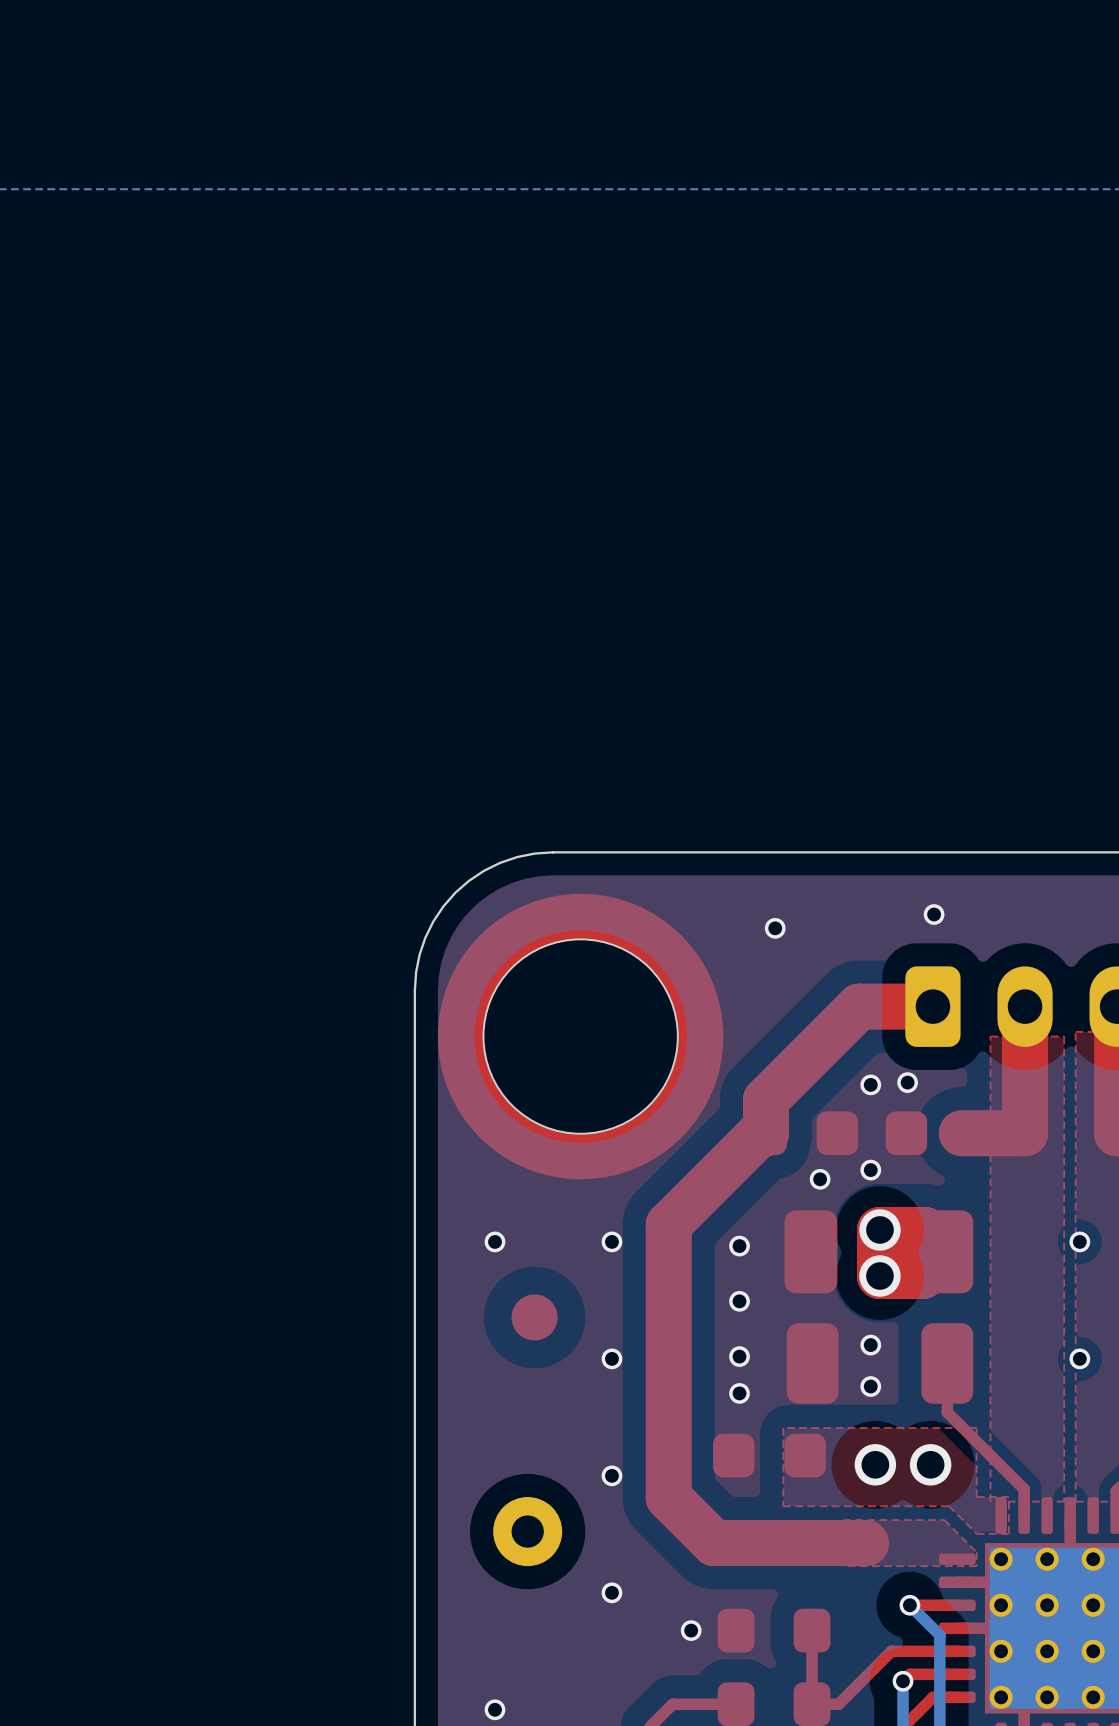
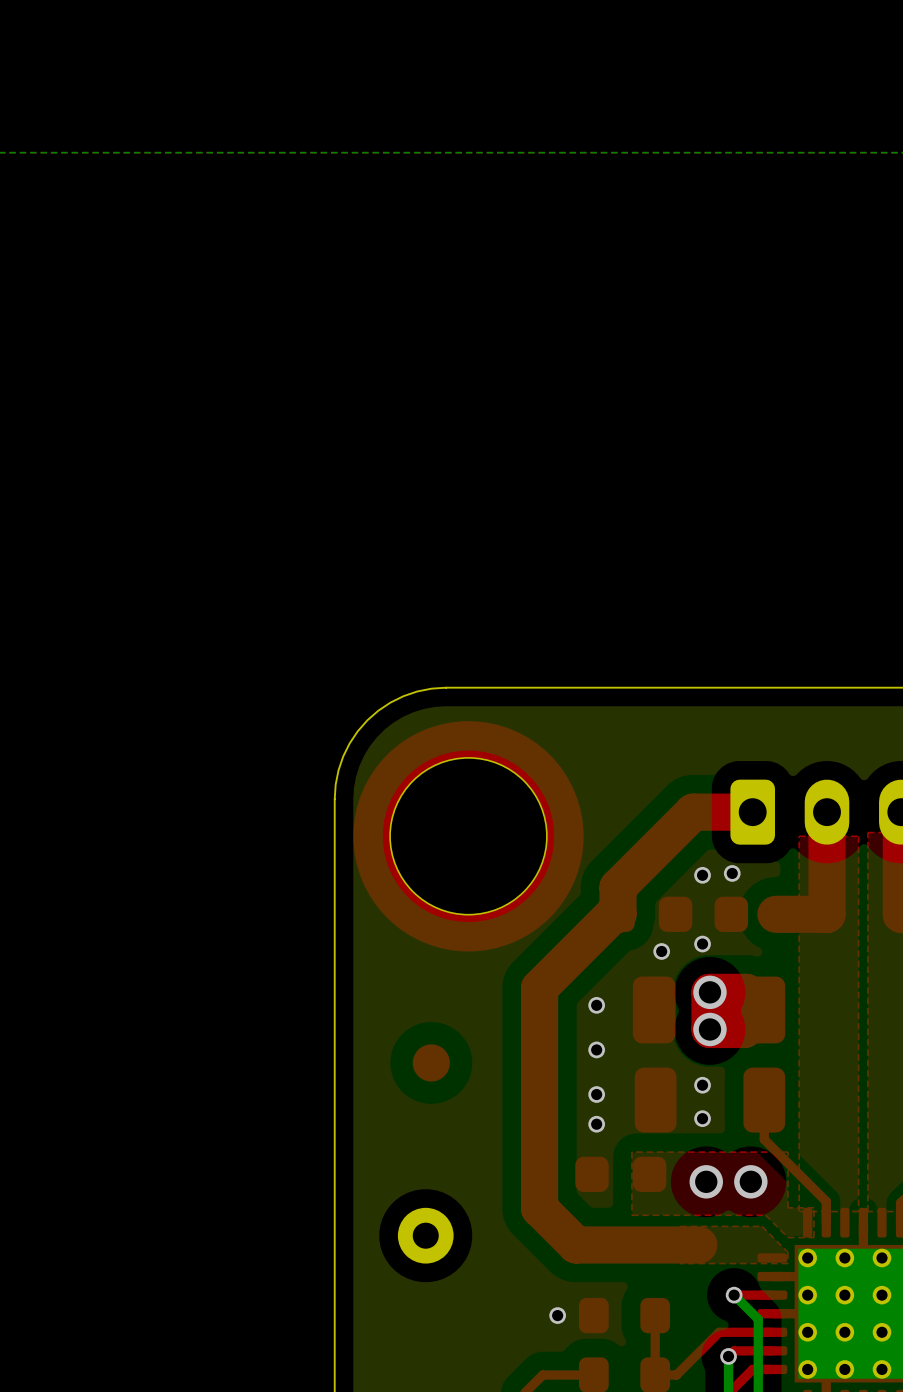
via: (934, 914) -> none
via: (775, 928) -> none
via: (495, 1241) -> none
via: (611, 1241) -> none
via: (1079, 1241) -> none
via: (611, 1358) -> none
via: (1079, 1358) -> none
via: (611, 1475) -> none
via: (611, 1592) -> none
via: (495, 1709) -> none

